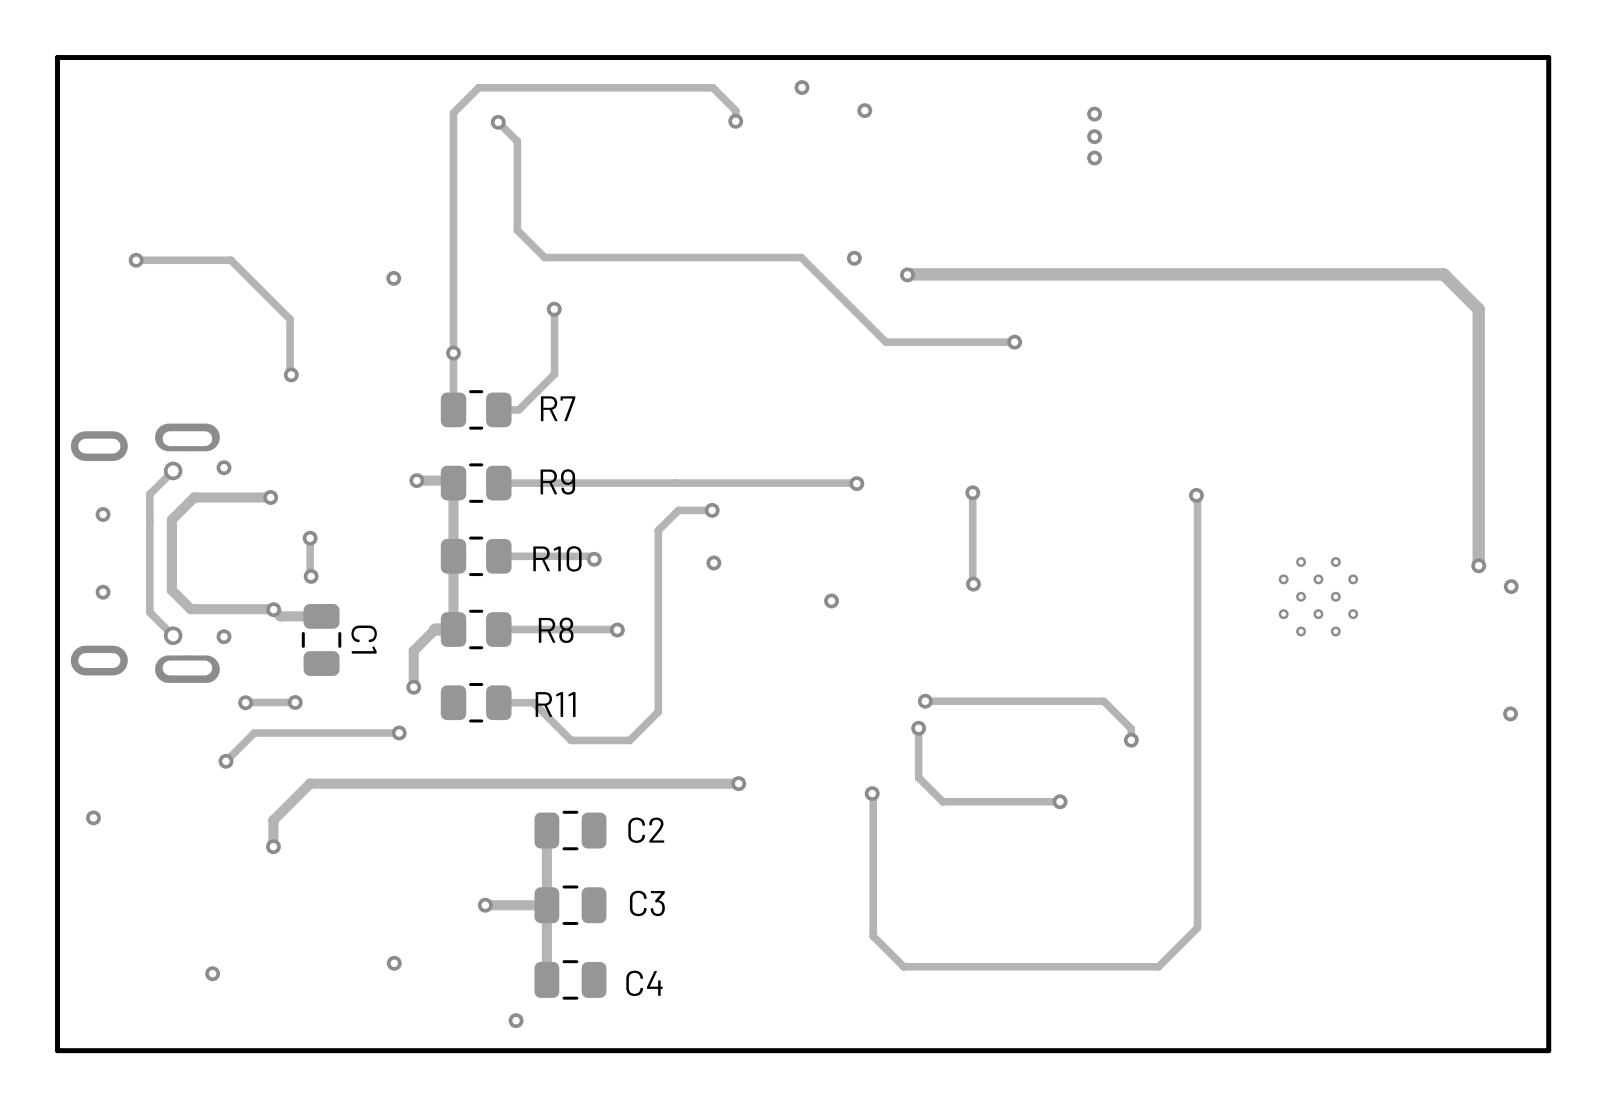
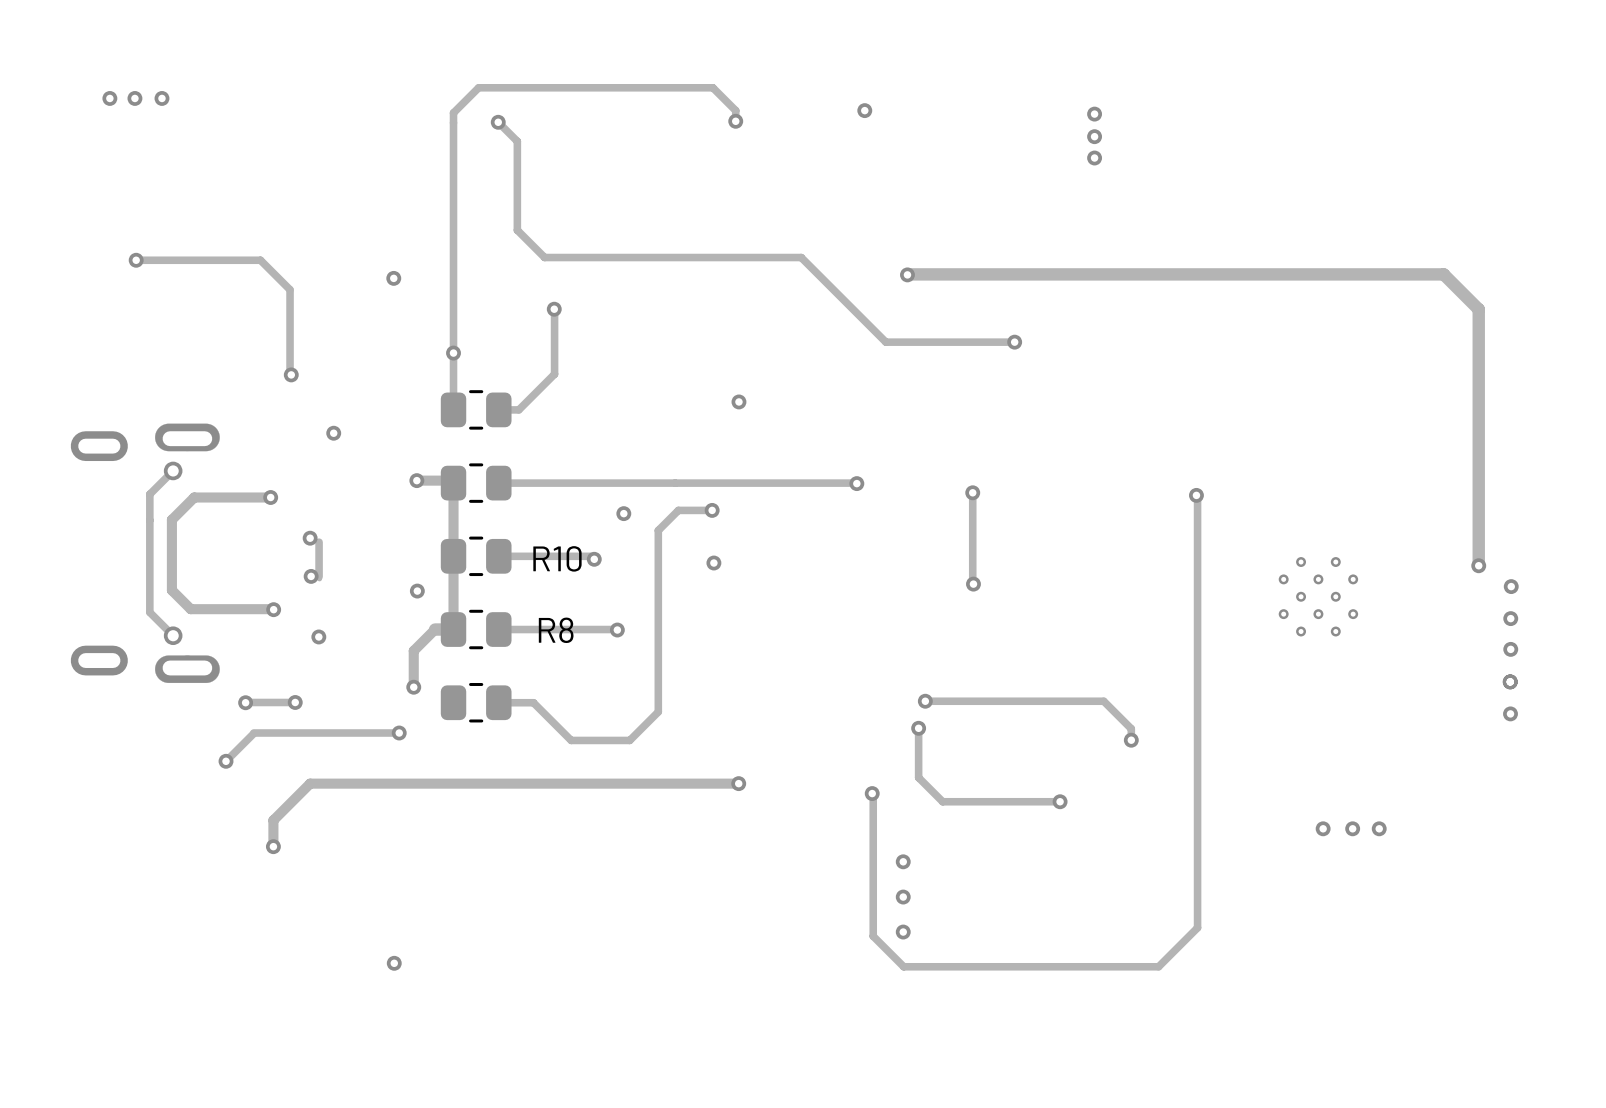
board edge: (1548, 57) (57, 57) (57, 1050) (1548, 1050) (1548, 57) -> none
via: (801, 87) -> none
via: none -> (109, 98)
via: none -> (134, 98)
via: none -> (161, 98)
via: (854, 258) -> none
track: (230, 260) (290, 319) -> (230, 260) (260, 260) (290, 289) (290, 319)
via: none -> (738, 401)
R7 name: R7 (558, 408) -> none
via: none -> (333, 433)
via: (224, 467) -> none
R9 name: R9 (557, 481) -> none
via: none -> (623, 513)
via: (103, 514) -> none
track: (310, 538) (311, 576) -> none
track: none -> (319, 542) (319, 578)
via: none -> (417, 591)
via: (103, 592) -> none
via: (831, 600) -> none
track: (273, 609) (280, 616) (321, 616) -> none
via: none -> (1510, 618)
via position: (224, 636) -> (318, 636)
C1: (321, 639) -> none
via: none -> (1510, 649)
via: none -> (1510, 681)
R11 name: R11 (555, 704) -> none
via: (93, 817) -> none
via: none -> (1323, 828)
via: none -> (1352, 828)
via: none -> (1379, 828)
track: (546, 830) (546, 979) -> none
C2: (570, 830) -> none
via: none -> (903, 861)
via: none -> (903, 897)
via: (485, 905) -> none
track: (546, 905) (485, 905) -> none
C3: (570, 905) -> none
via: none -> (903, 932)
via: (212, 973) -> none
C4: (570, 979) -> none
via: (516, 1020) -> none

